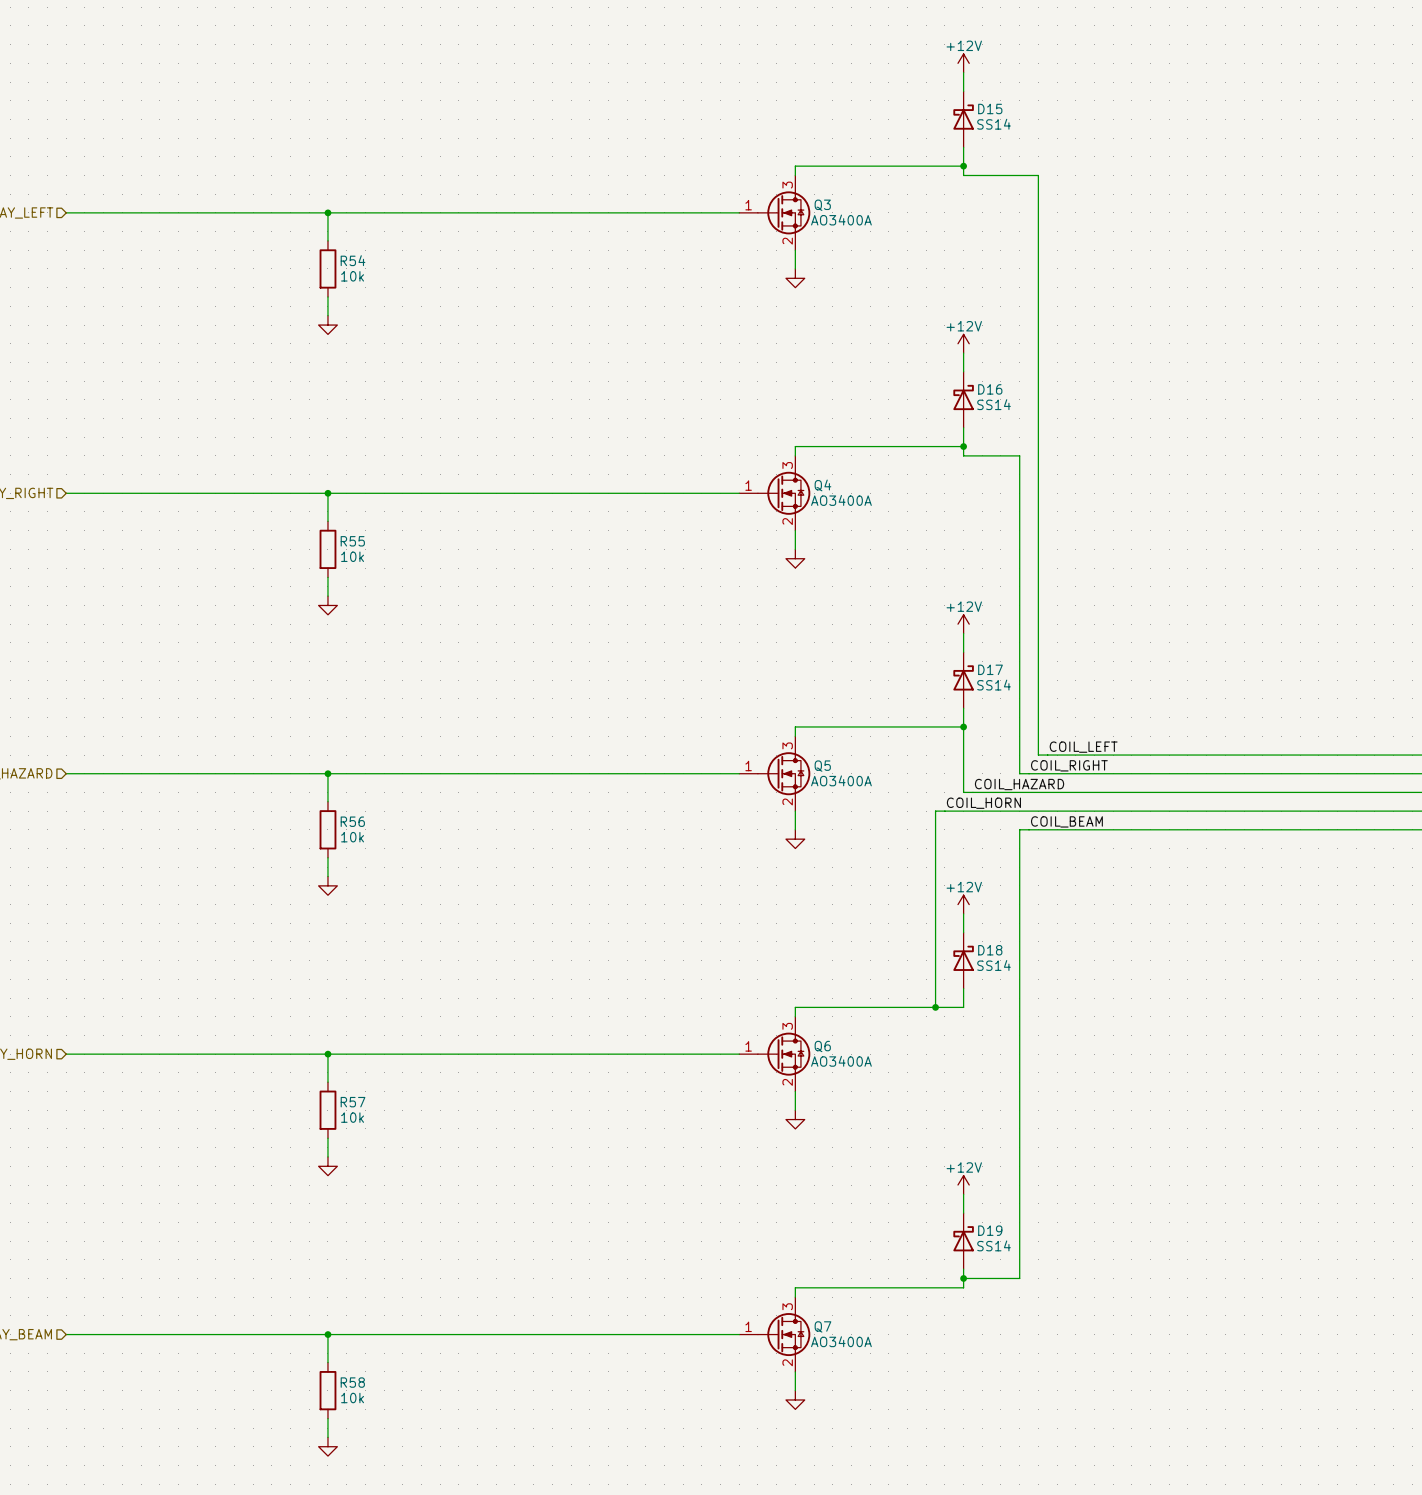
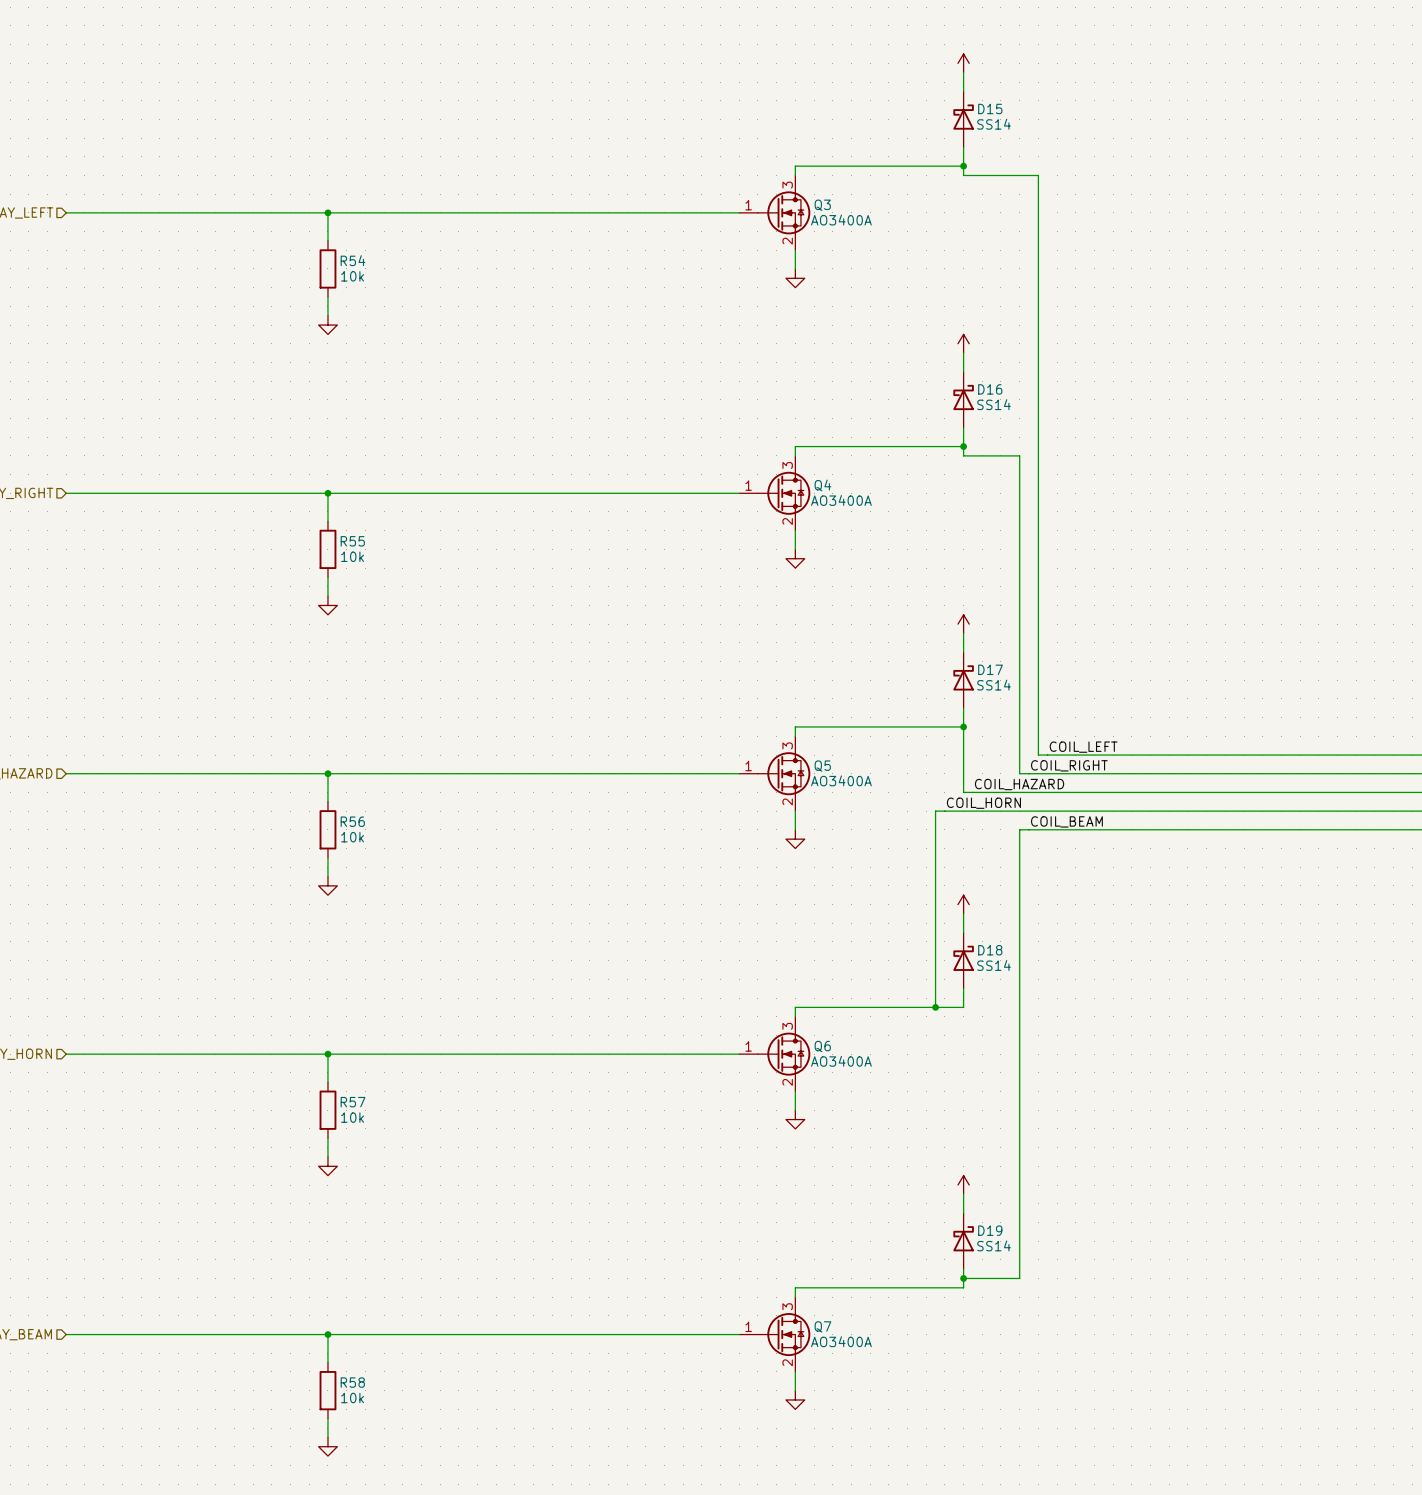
power symbol text: +12V (964, 45) -> none
power symbol text: +12V (964, 326) -> none
power symbol text: +12V (964, 606) -> none
power symbol text: +12V (964, 887) -> none
power symbol text: +12V (964, 1167) -> none

